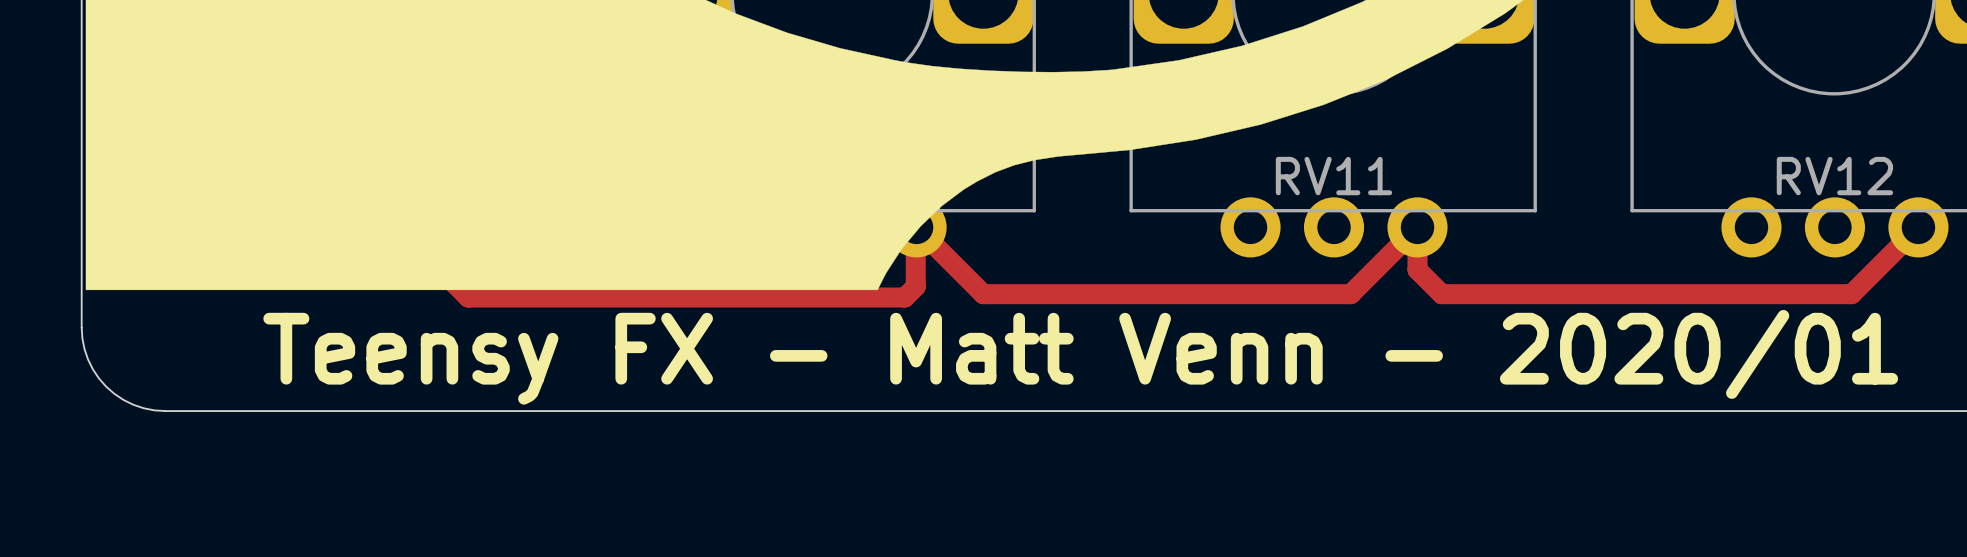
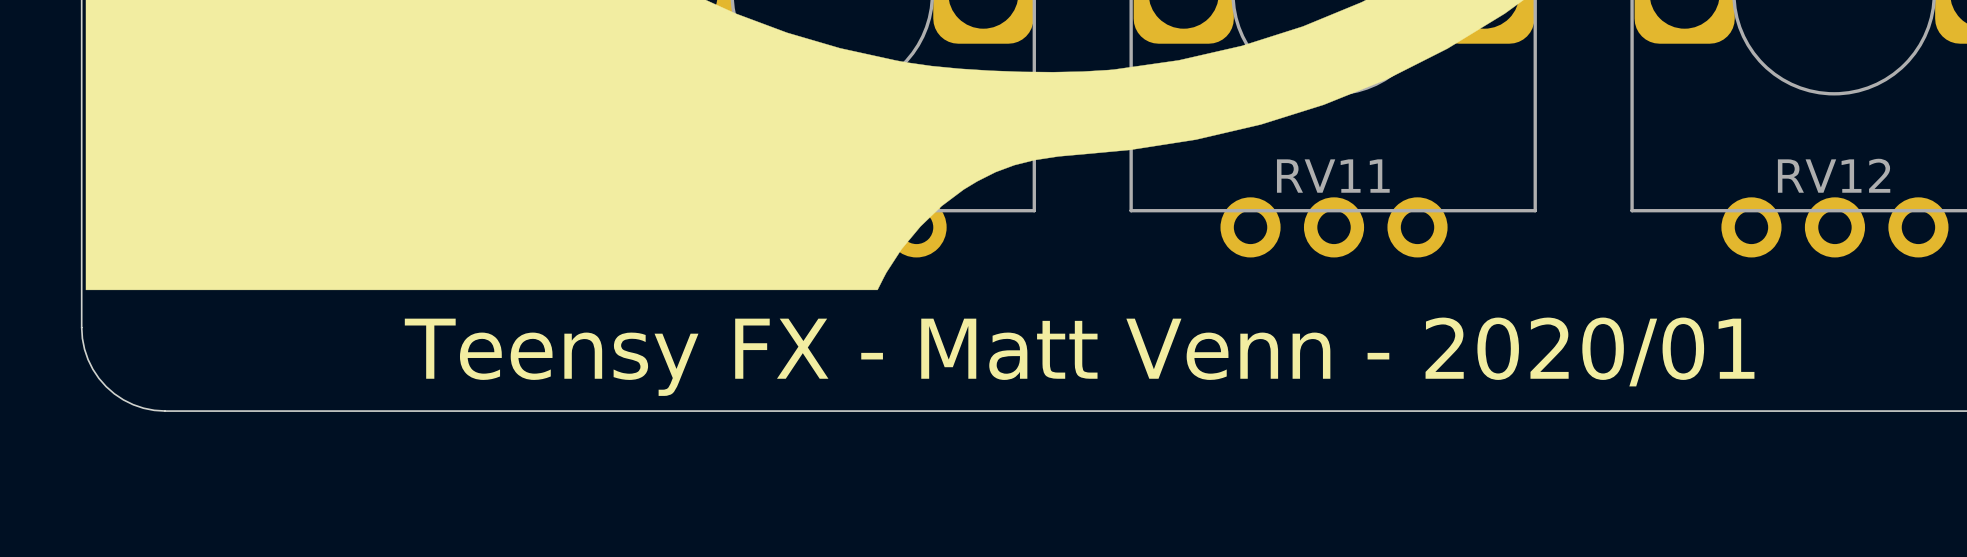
track: (1918, 227) (1851, 294) (1441, 294) (1417, 269) (1417, 227) (1350, 294) (983, 294) (916, 227) (915, 286) (904, 297) (468, 297) (414, 244) -> none

